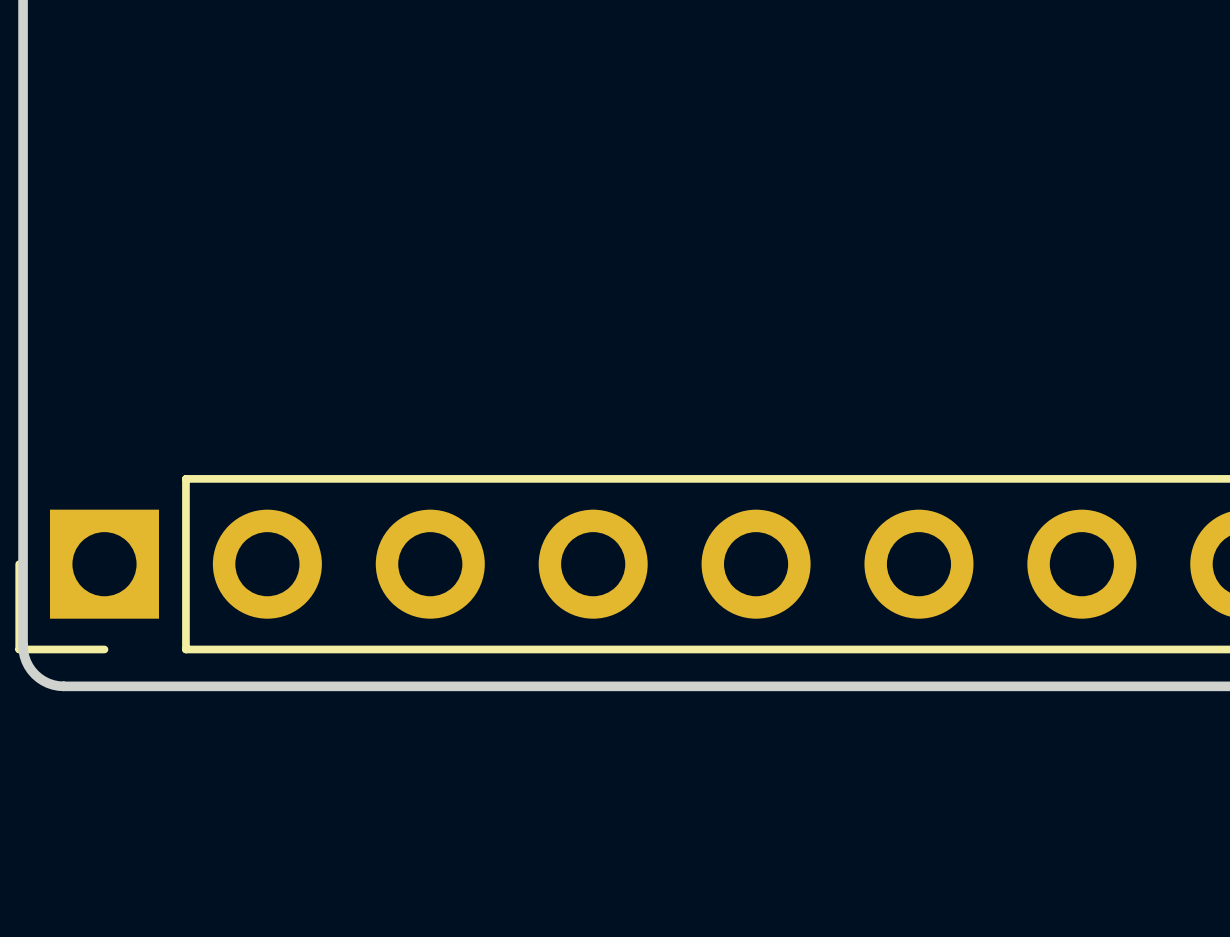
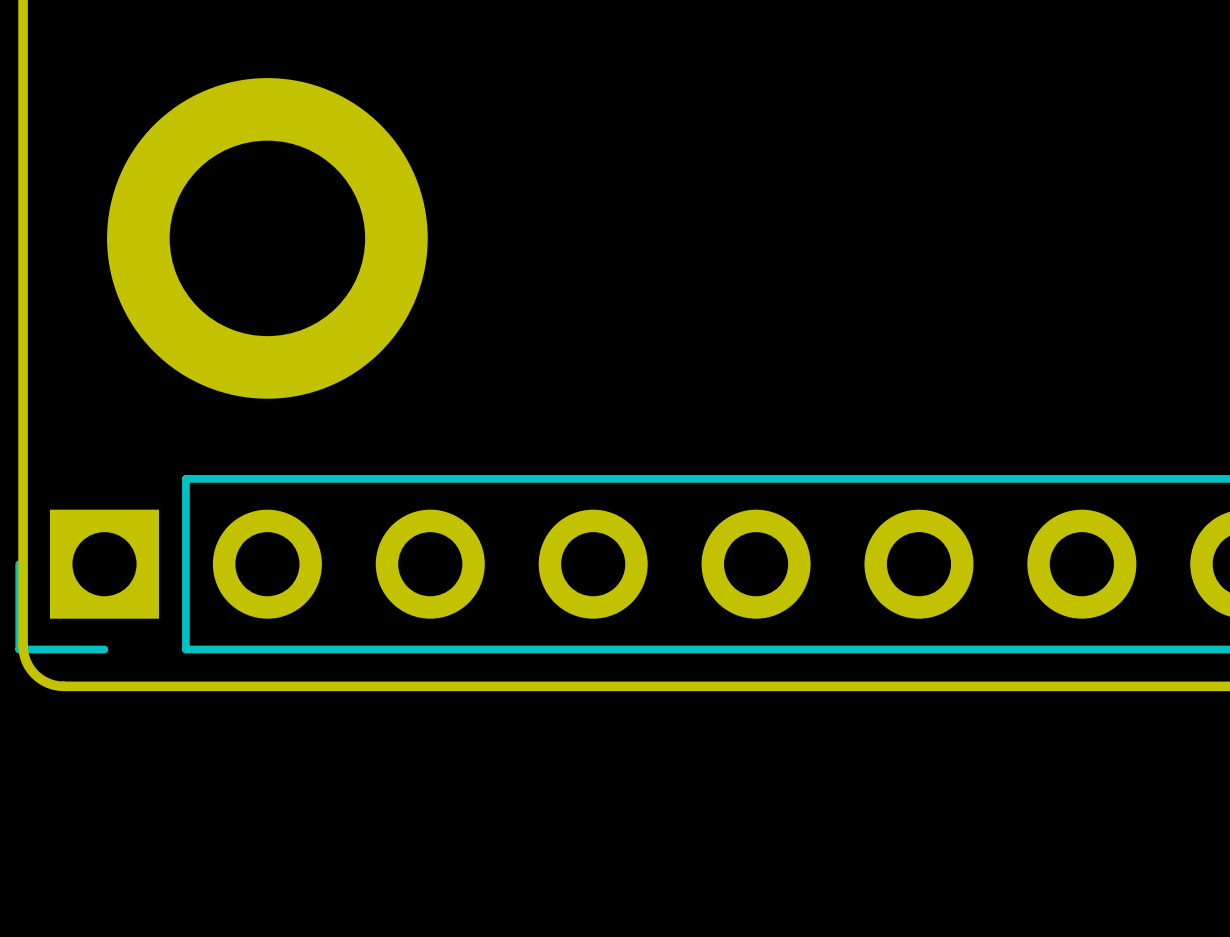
part: none -> (267, 238)

